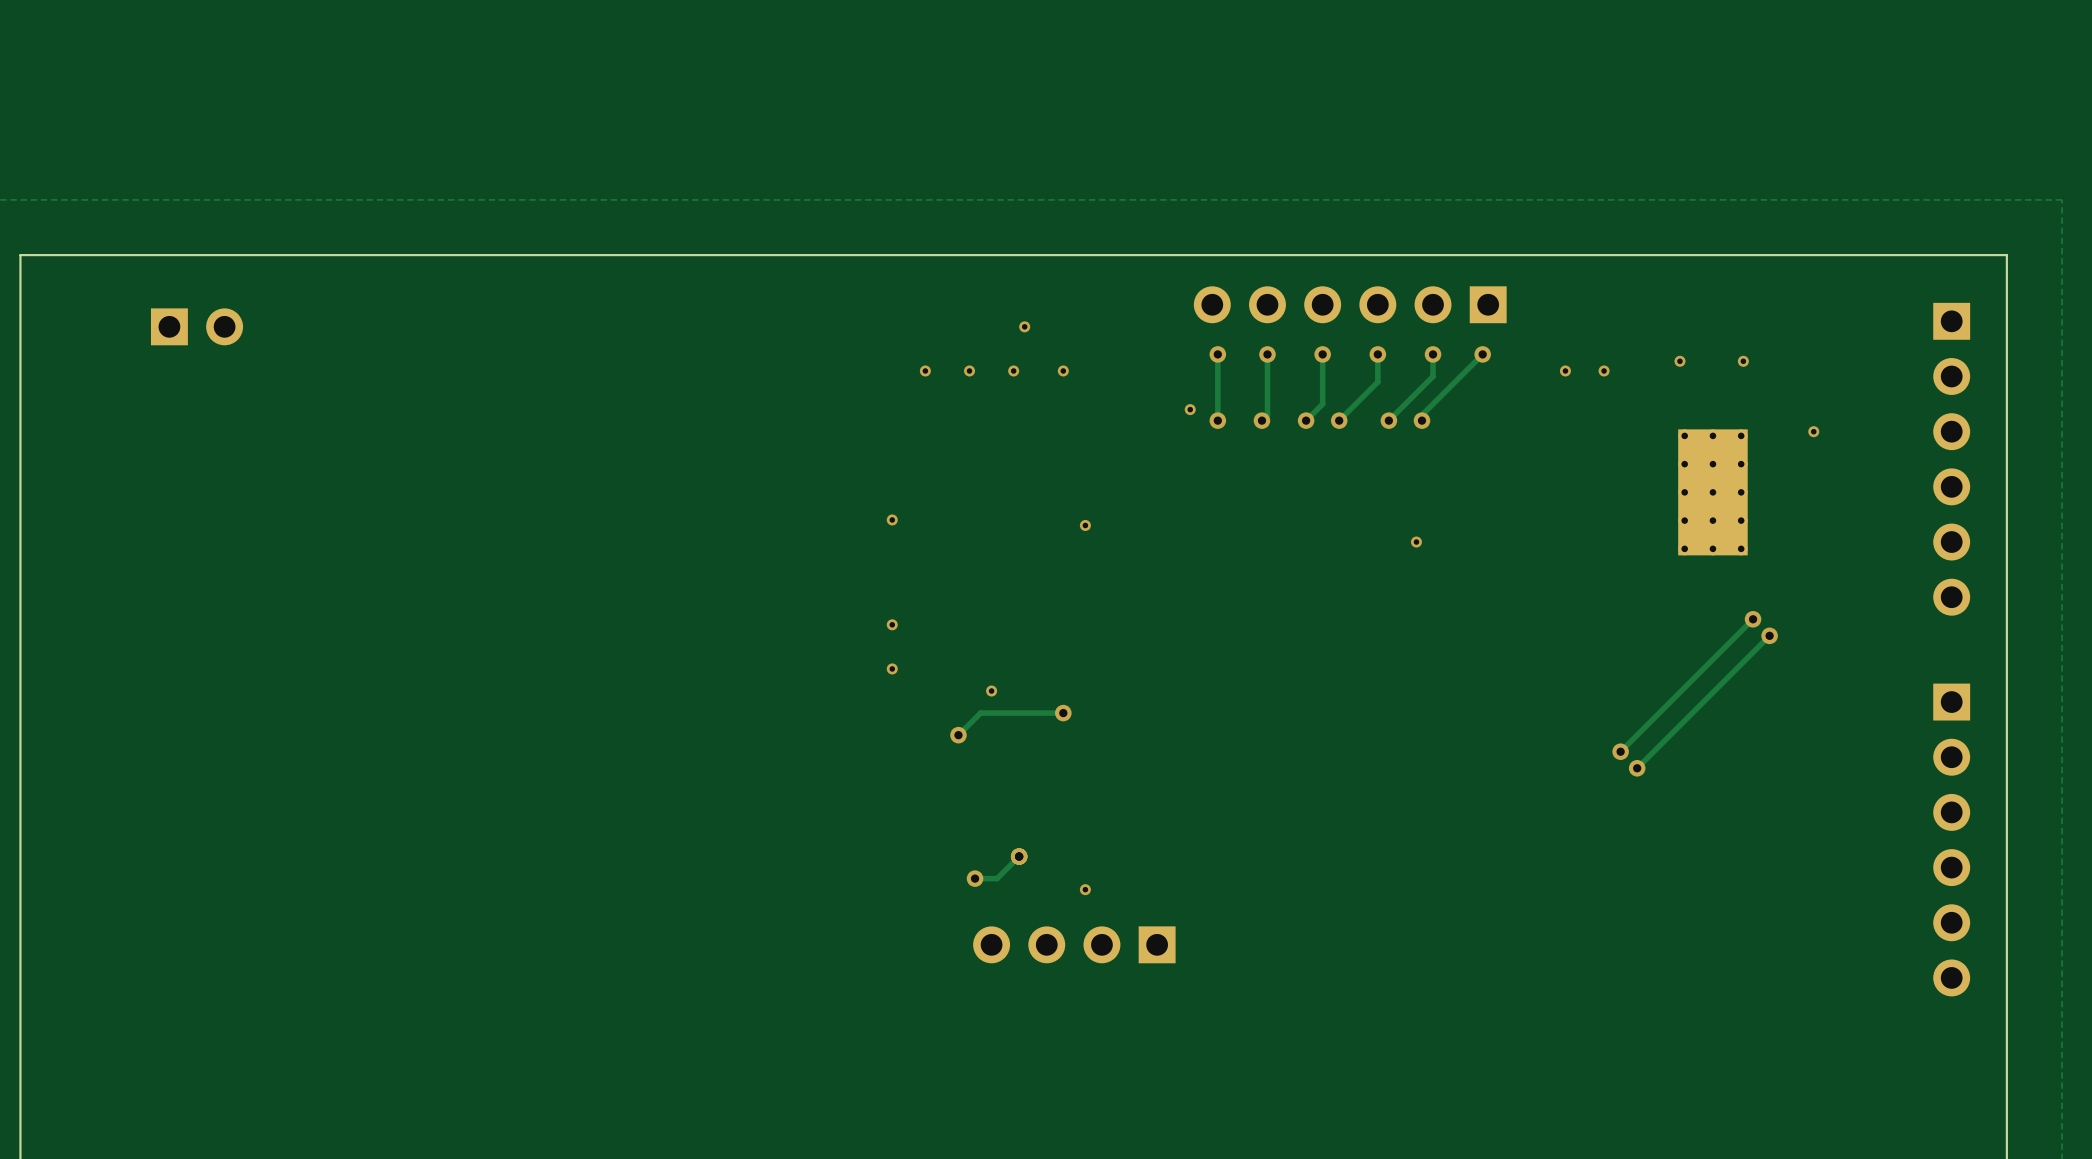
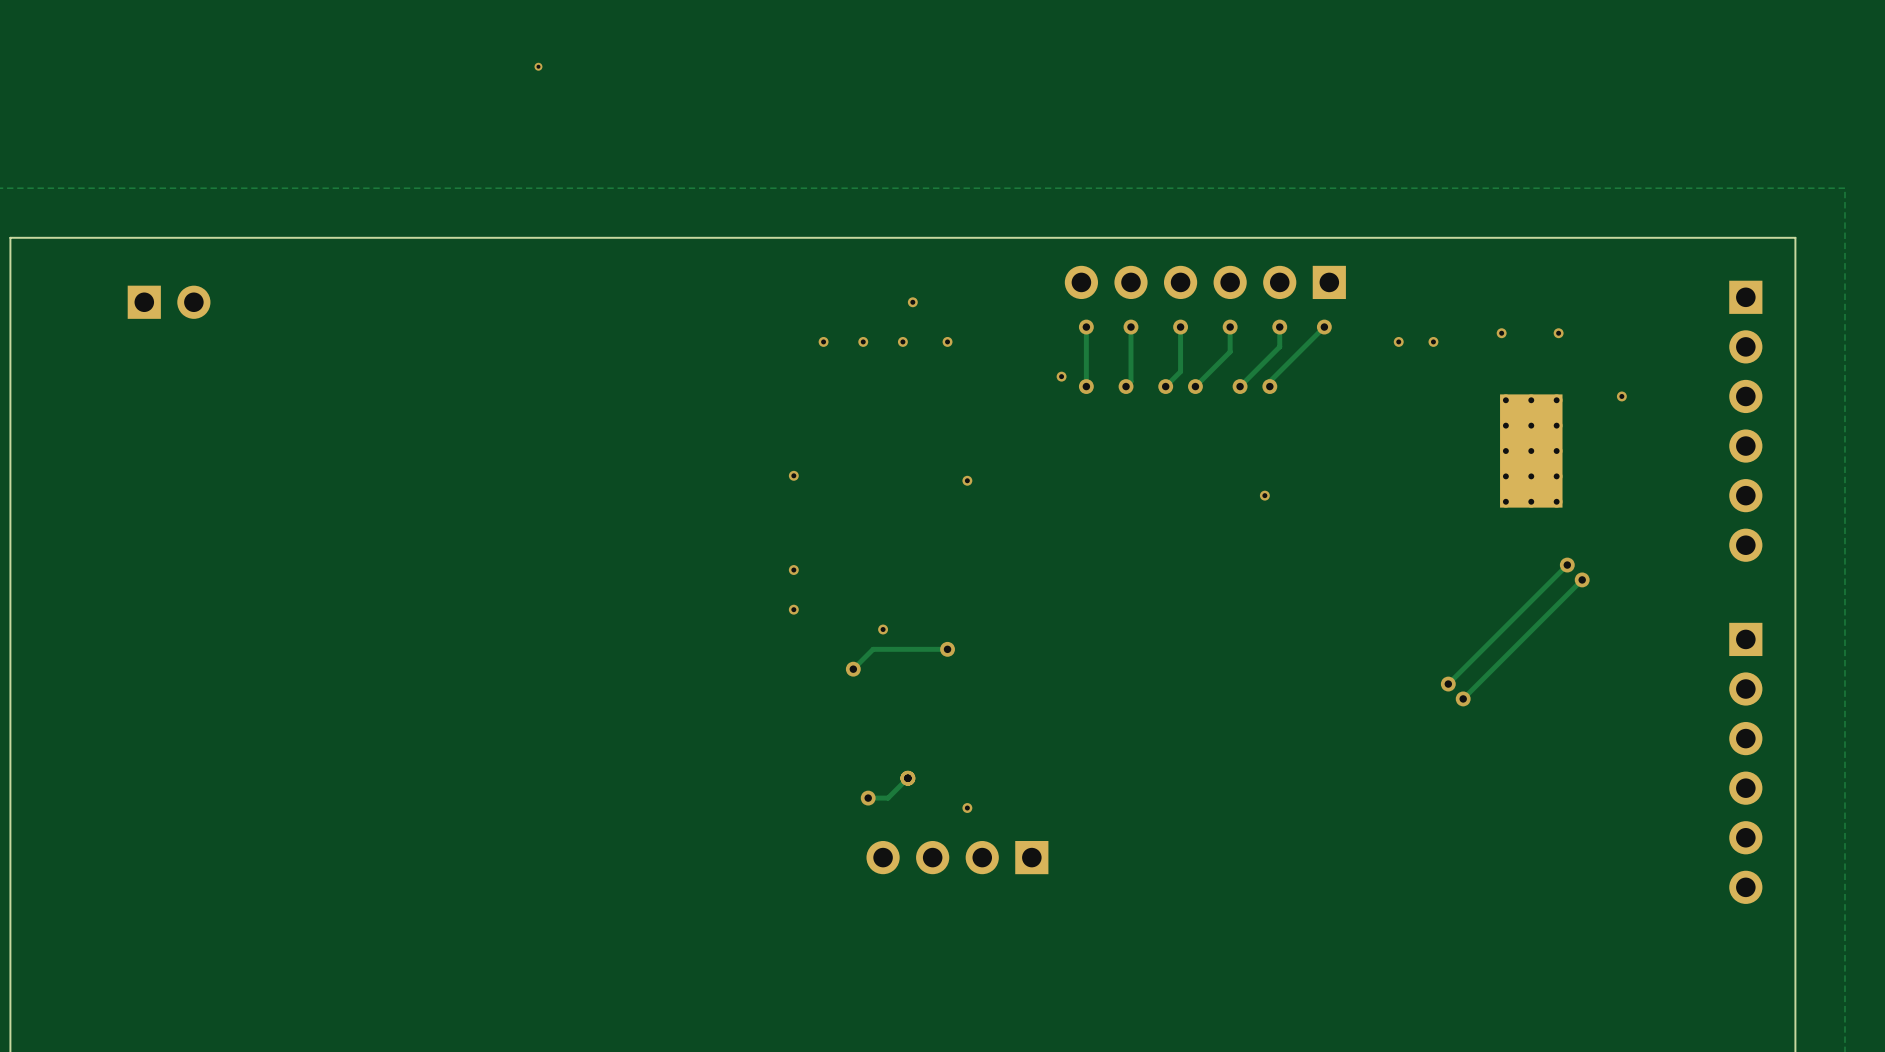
via: none -> (538, 66)

